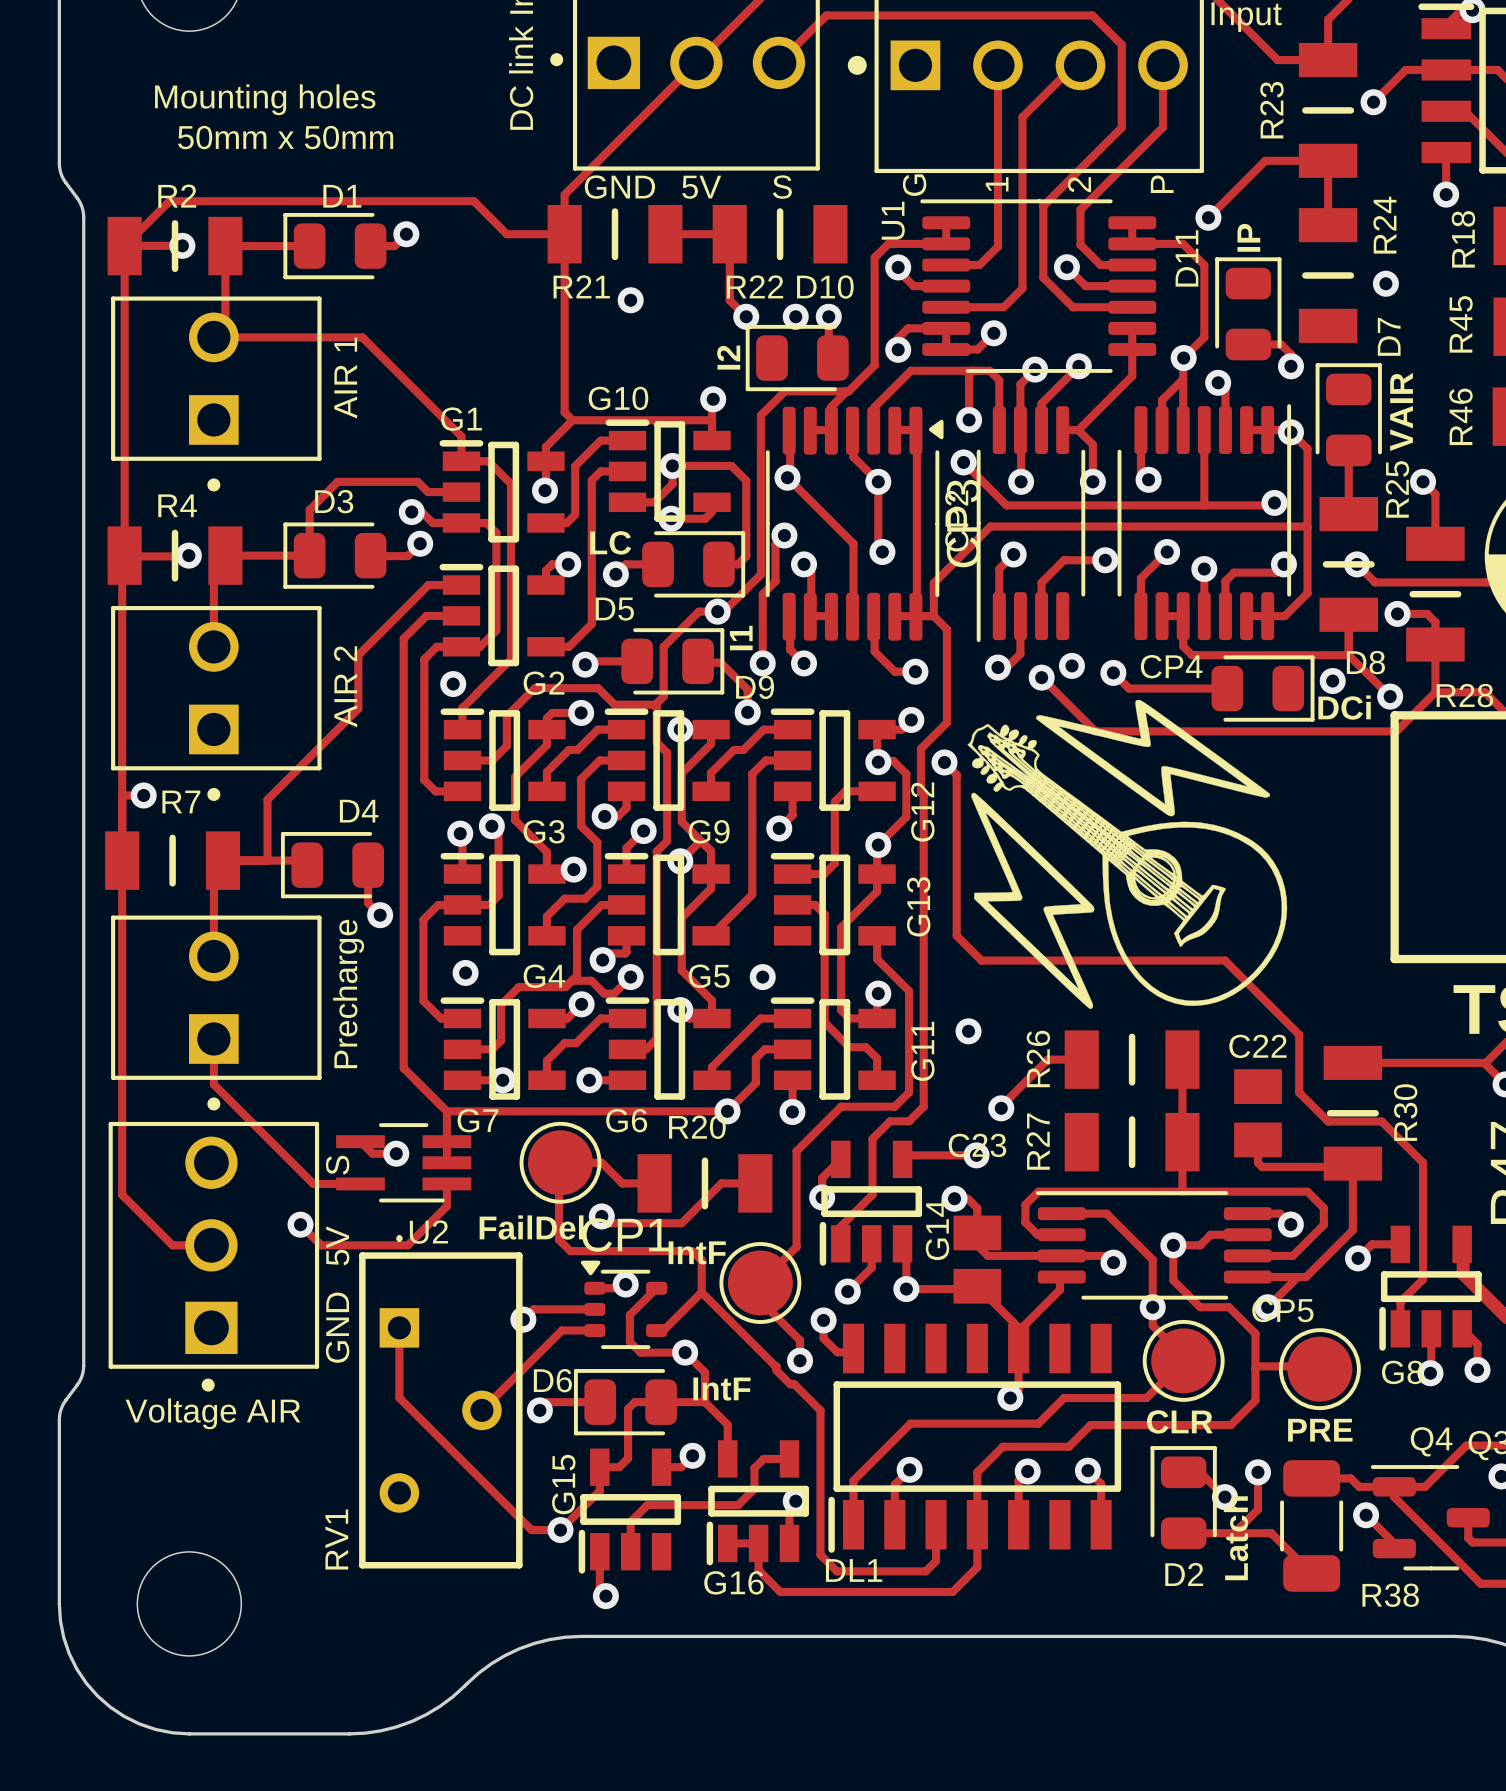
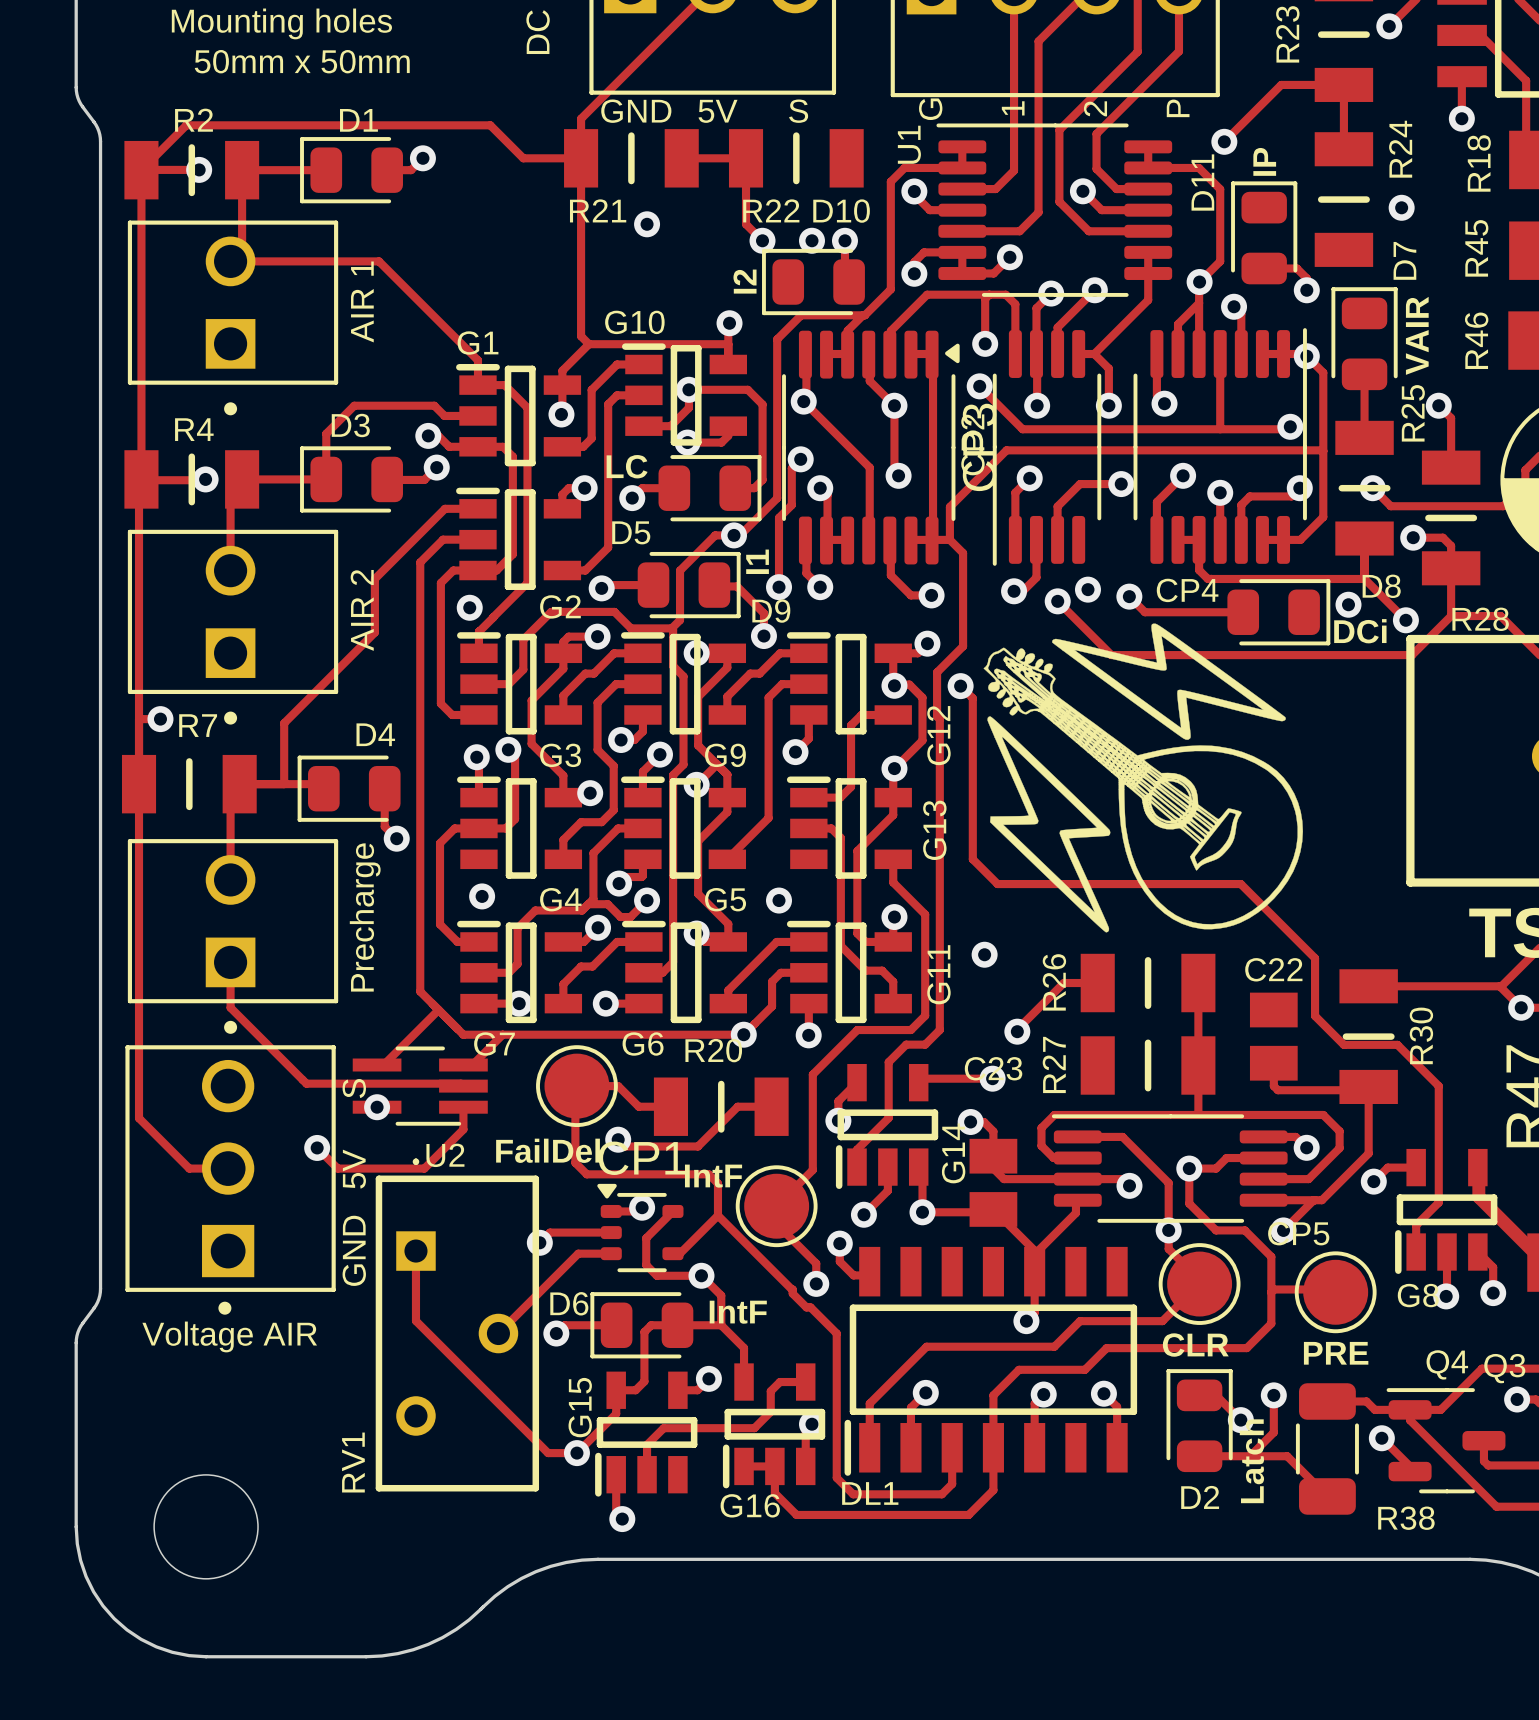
track: (446, 1111) (446, 1162) -> none
track: none -> (502, 1034) (472, 1065) (463, 1065)
track: (360, 1141) (372, 1153) (396, 1153) -> (377, 1065) (383, 1065) (438, 1009)
via position: (396, 1153) -> (377, 1107)
track: (289, 1160) (313, 1183) (360, 1183) -> (306, 1083) (461, 1083) (463, 1086)

